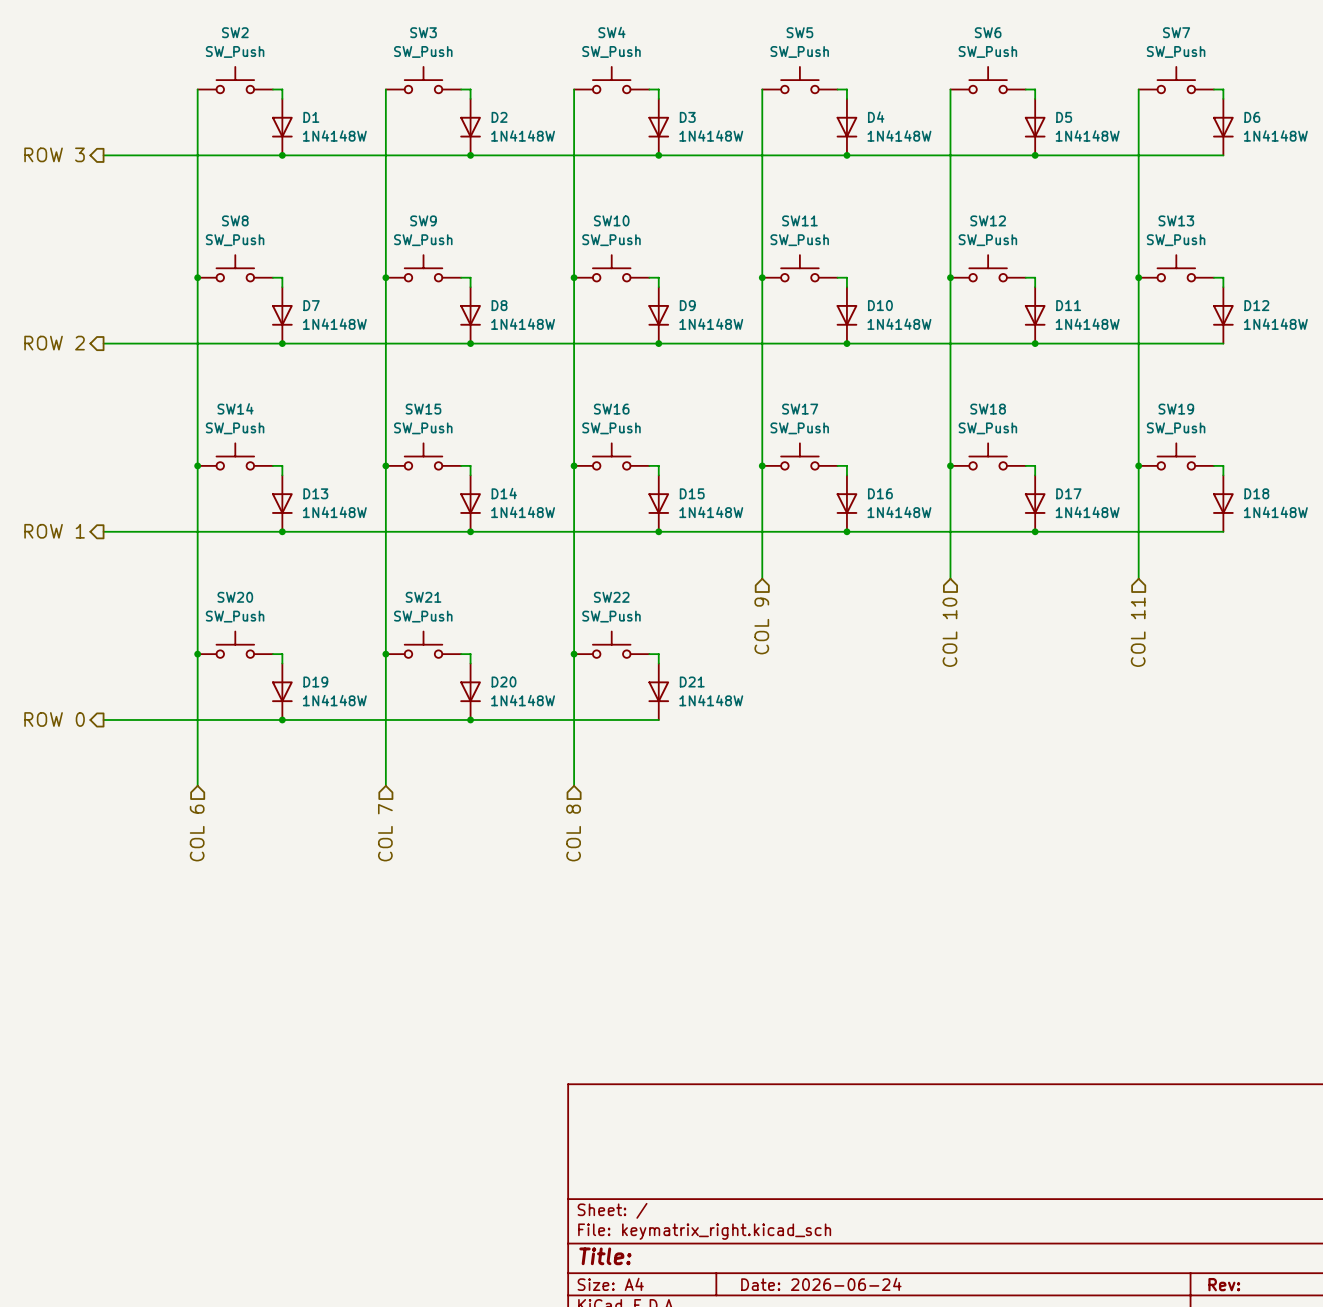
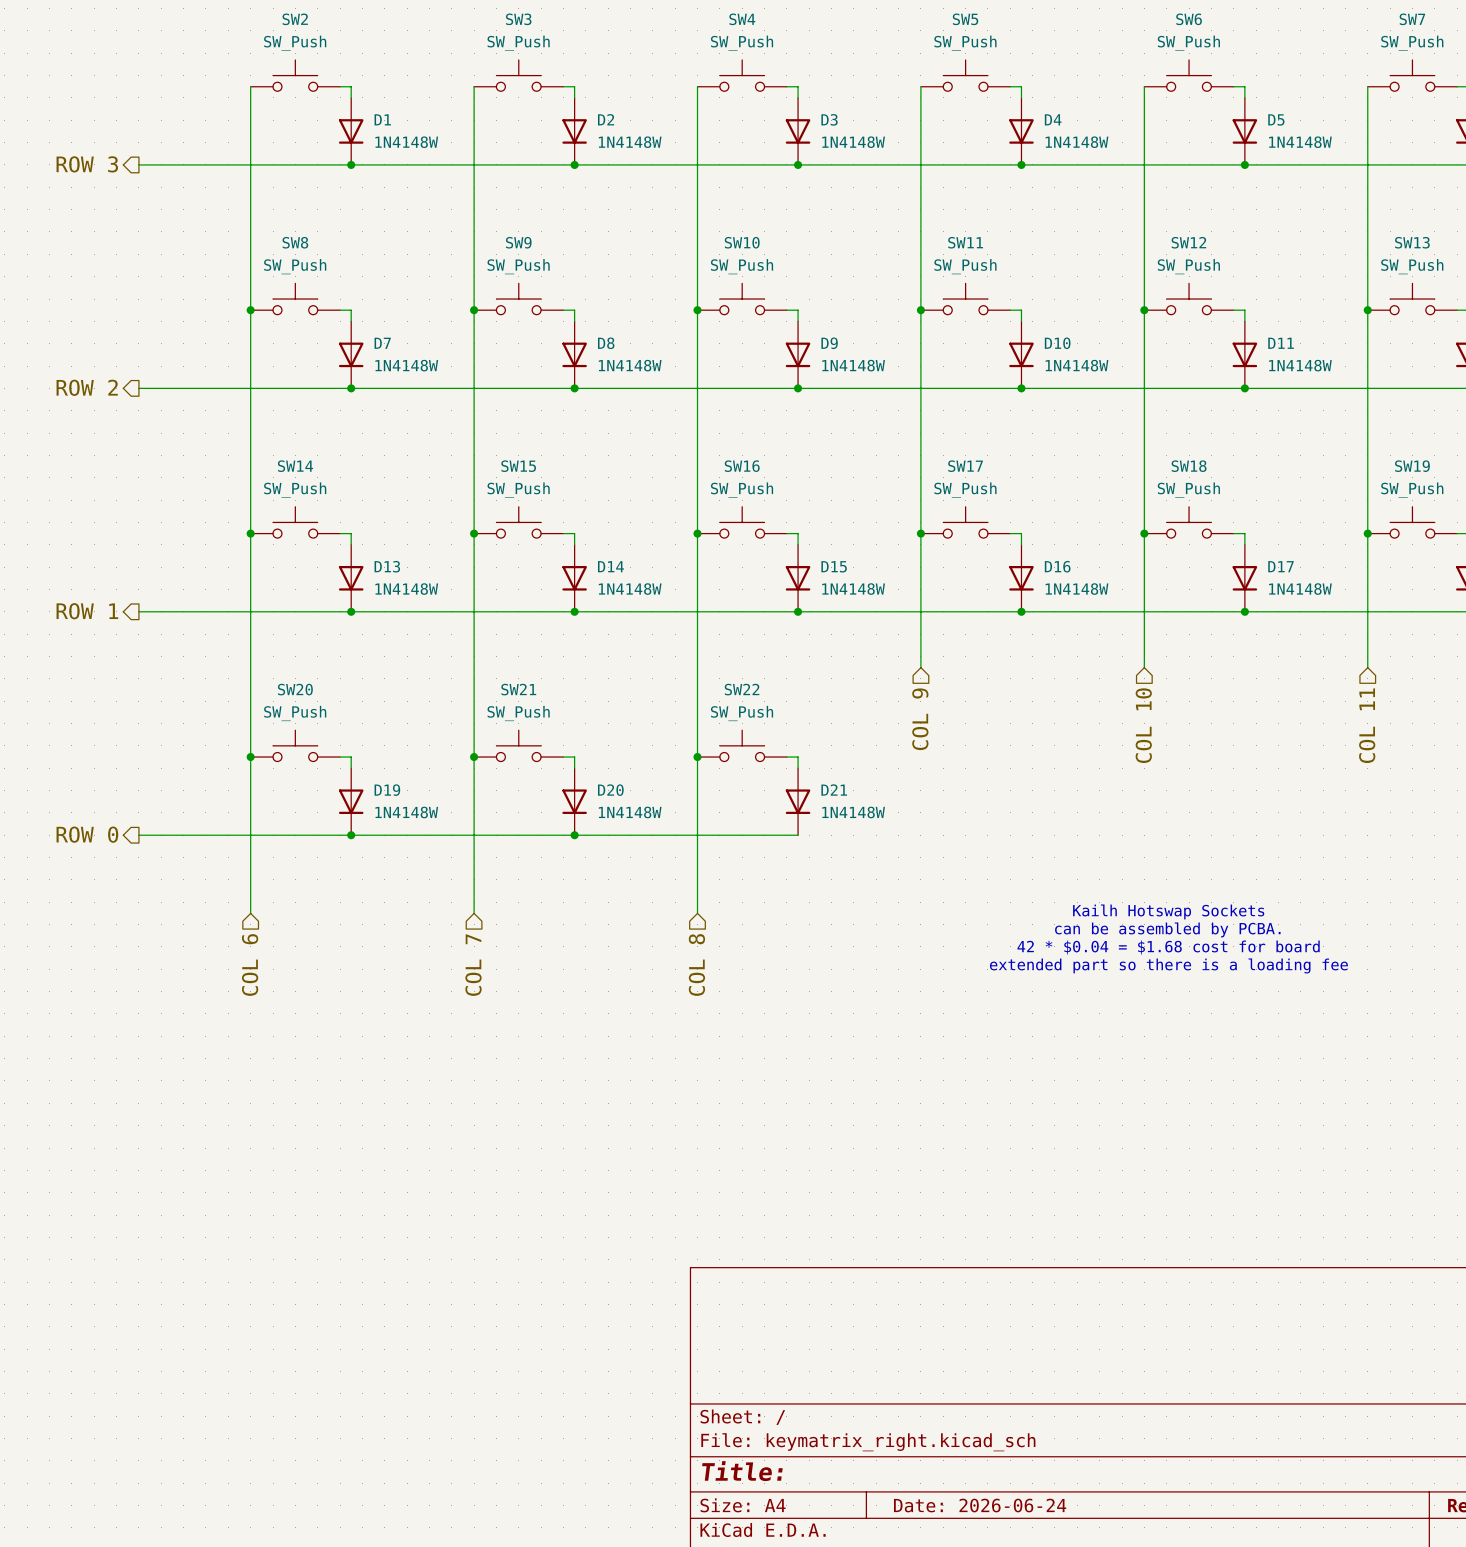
text: none -> Kailh Hotswap Sockets (1168, 911)
text: none -> can be assembled by PCBA. (1167, 929)
text: none -> 42 * $0.04 = $1.68 cost for board (1168, 947)
text: none -> extended part so there is a loading fee (1168, 965)

